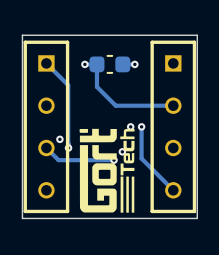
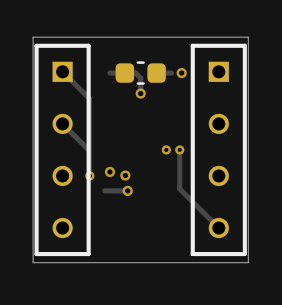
via: (84, 64) -> none
track: (96, 64) (96, 86) (115, 105) (173, 105) -> (124, 73) (135, 73) (140, 78) (140, 93)
via: (134, 64) -> none
via: none -> (181, 73)
via: none -> (140, 93)
track: none -> (62, 123) (89, 150)
drawing: [79, 128, 135, 213] -> none
via: (59, 139) -> none
via: none -> (109, 171)
via: none -> (125, 175)
track: (46, 148) (58, 160) (80, 160) -> none
via: (122, 151) -> none
via: none -> (127, 190)
track: (114, 160) (99, 160) -> none
via: (114, 160) -> none

